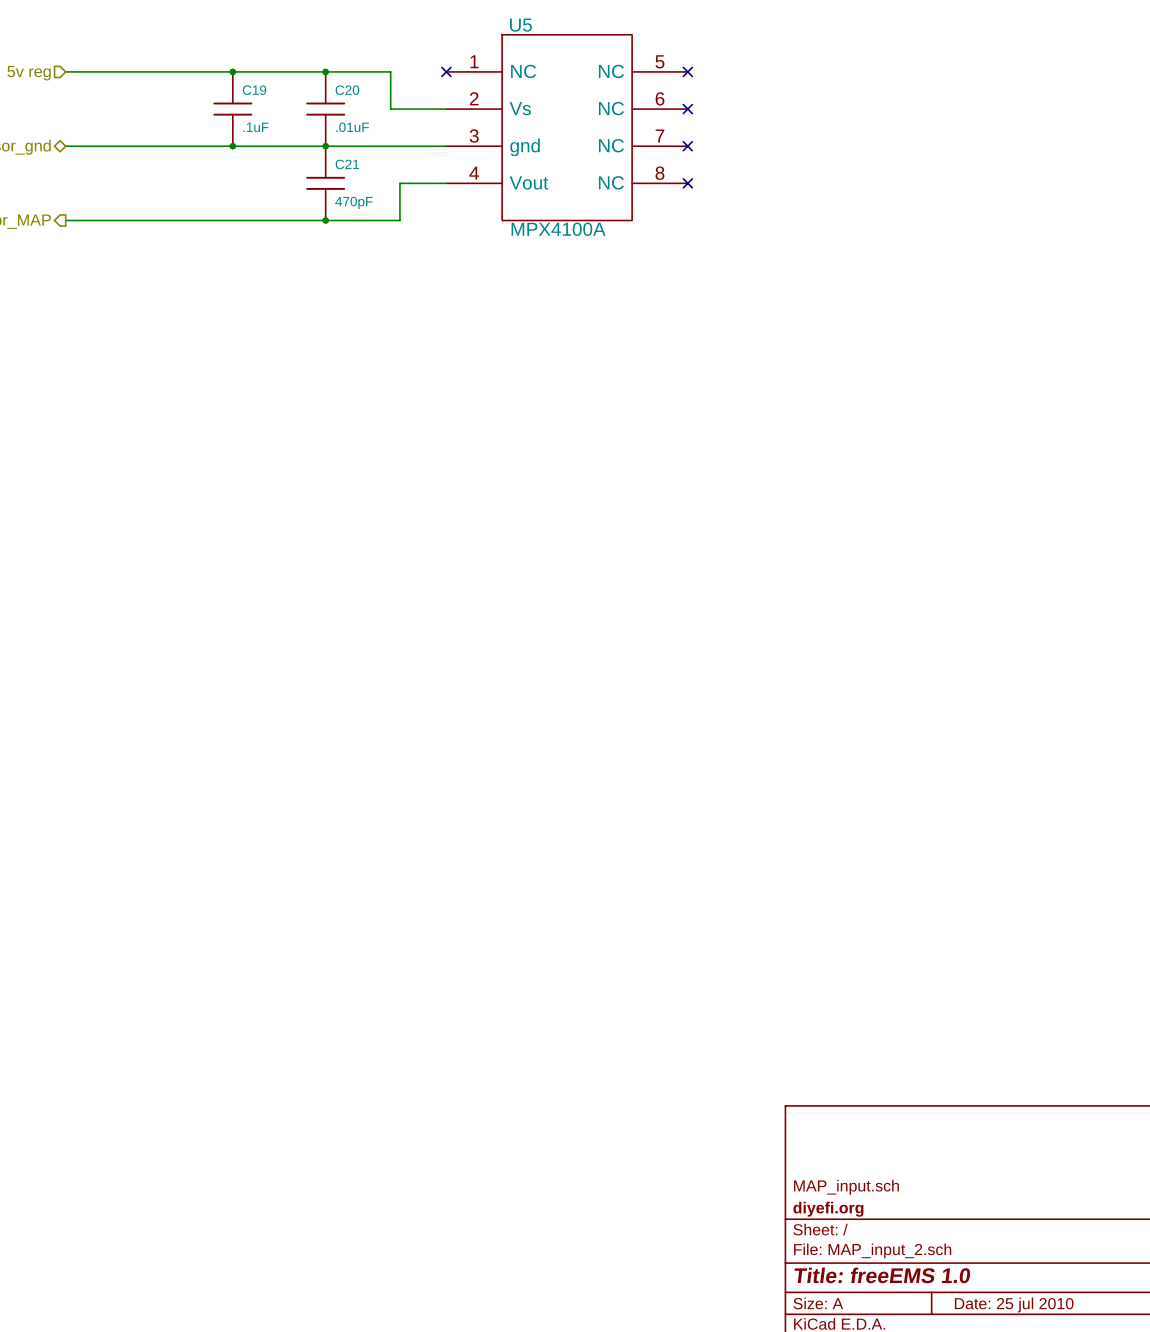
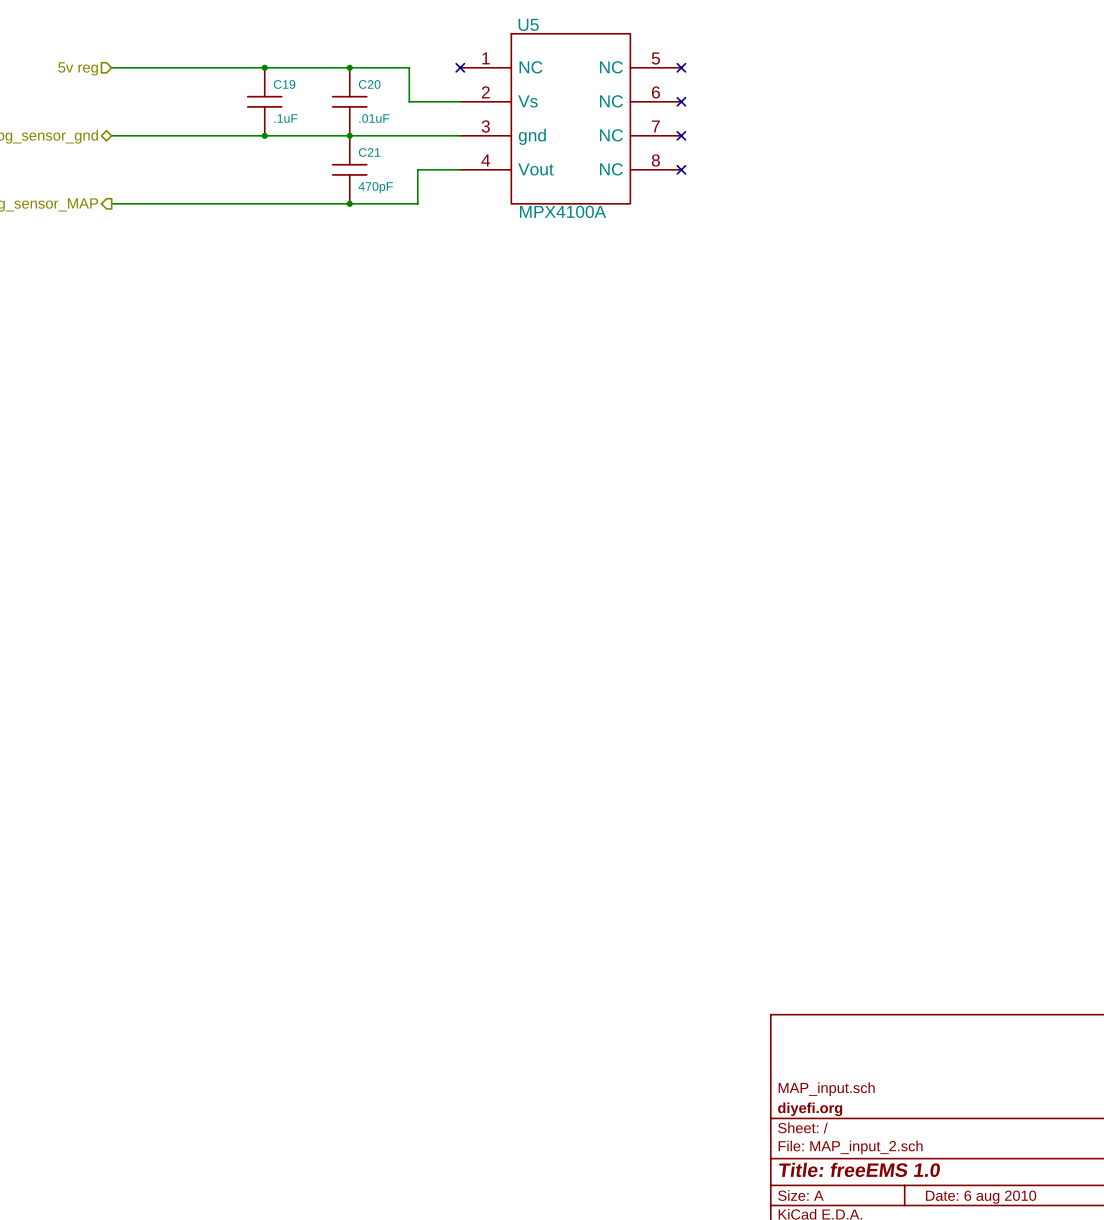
title block: Date: 25 jul 2010 (1014, 1305) -> Date: 6 aug 2010 (981, 1197)

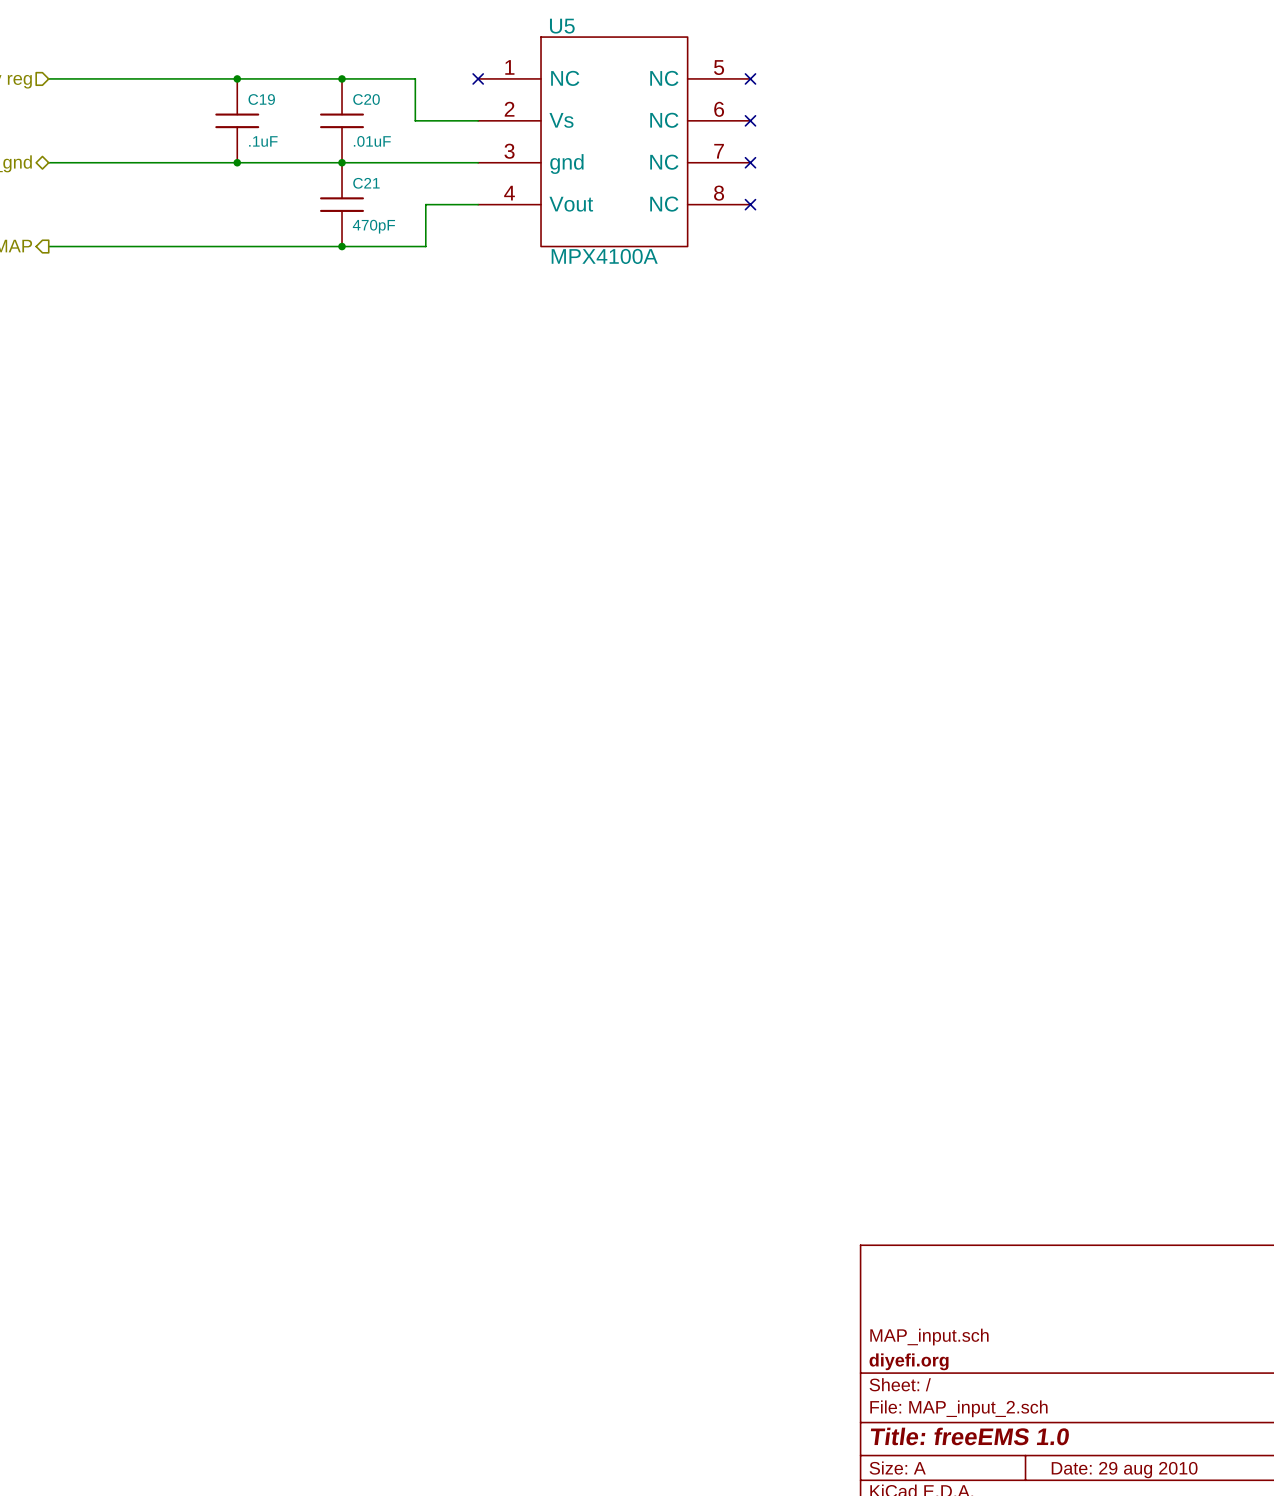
title block: Date: 6 aug 2010 (981, 1197) -> Date: 29 aug 2010 (1124, 1470)

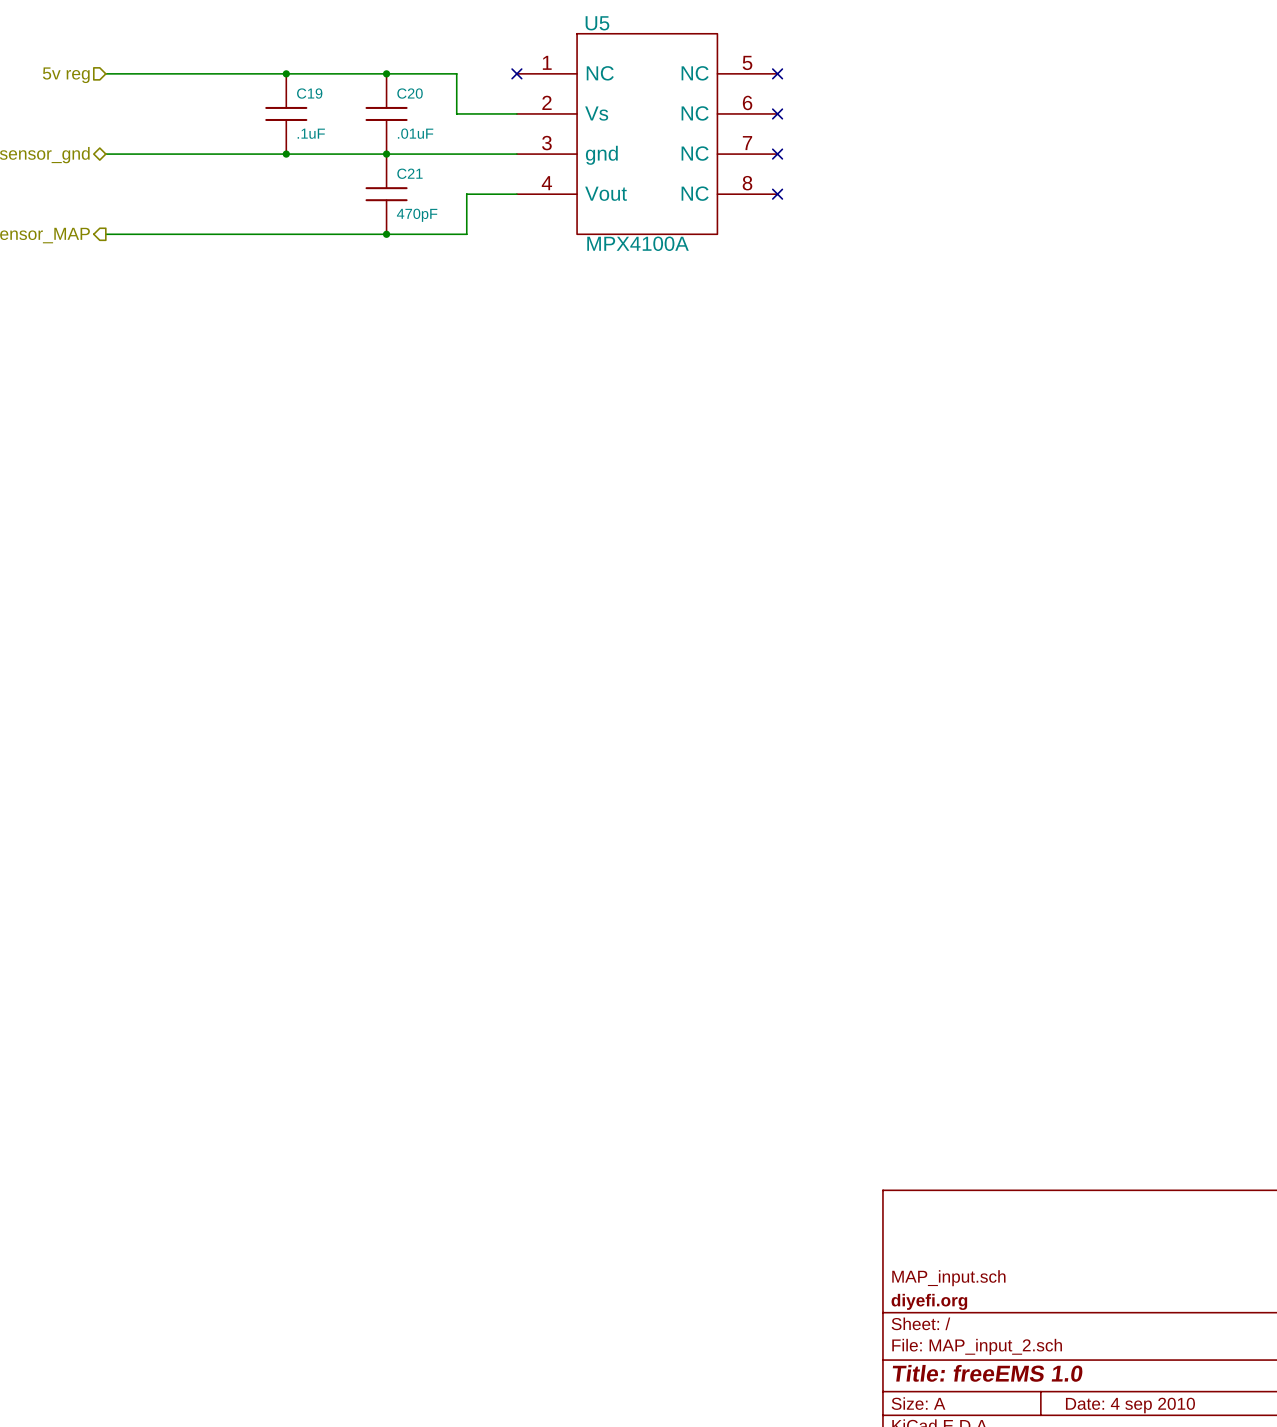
title block: Date: 29 aug 2010 (1124, 1470) -> Date: 4 sep 2010 (1130, 1405)

